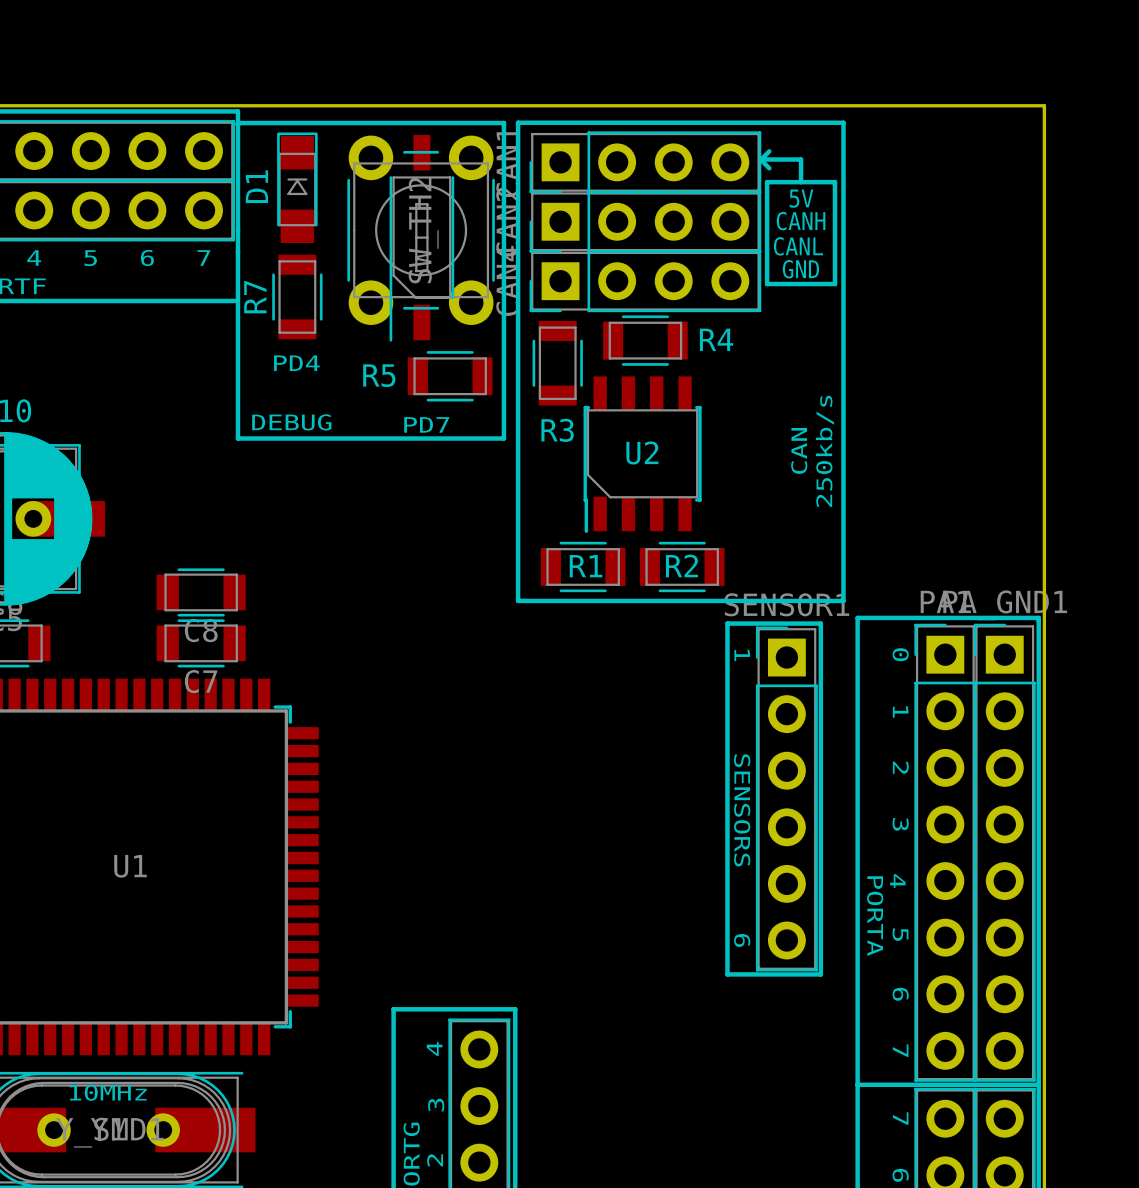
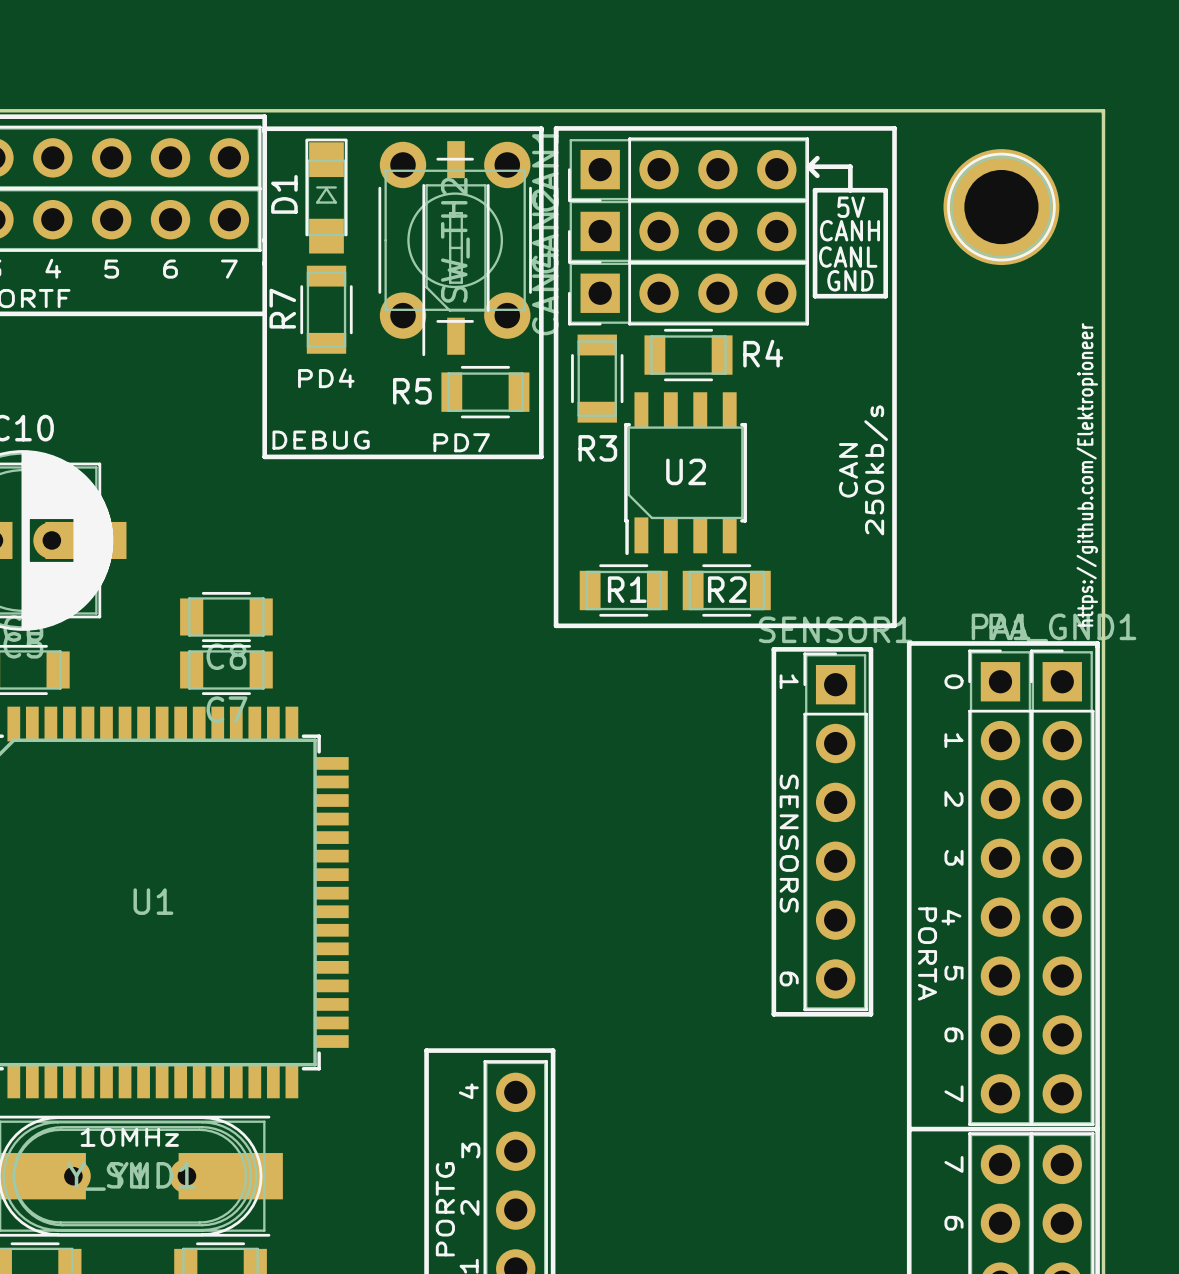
part: none -> (1001, 207)
text: none -> https://github.com/Elektropioneer (1087, 474)

